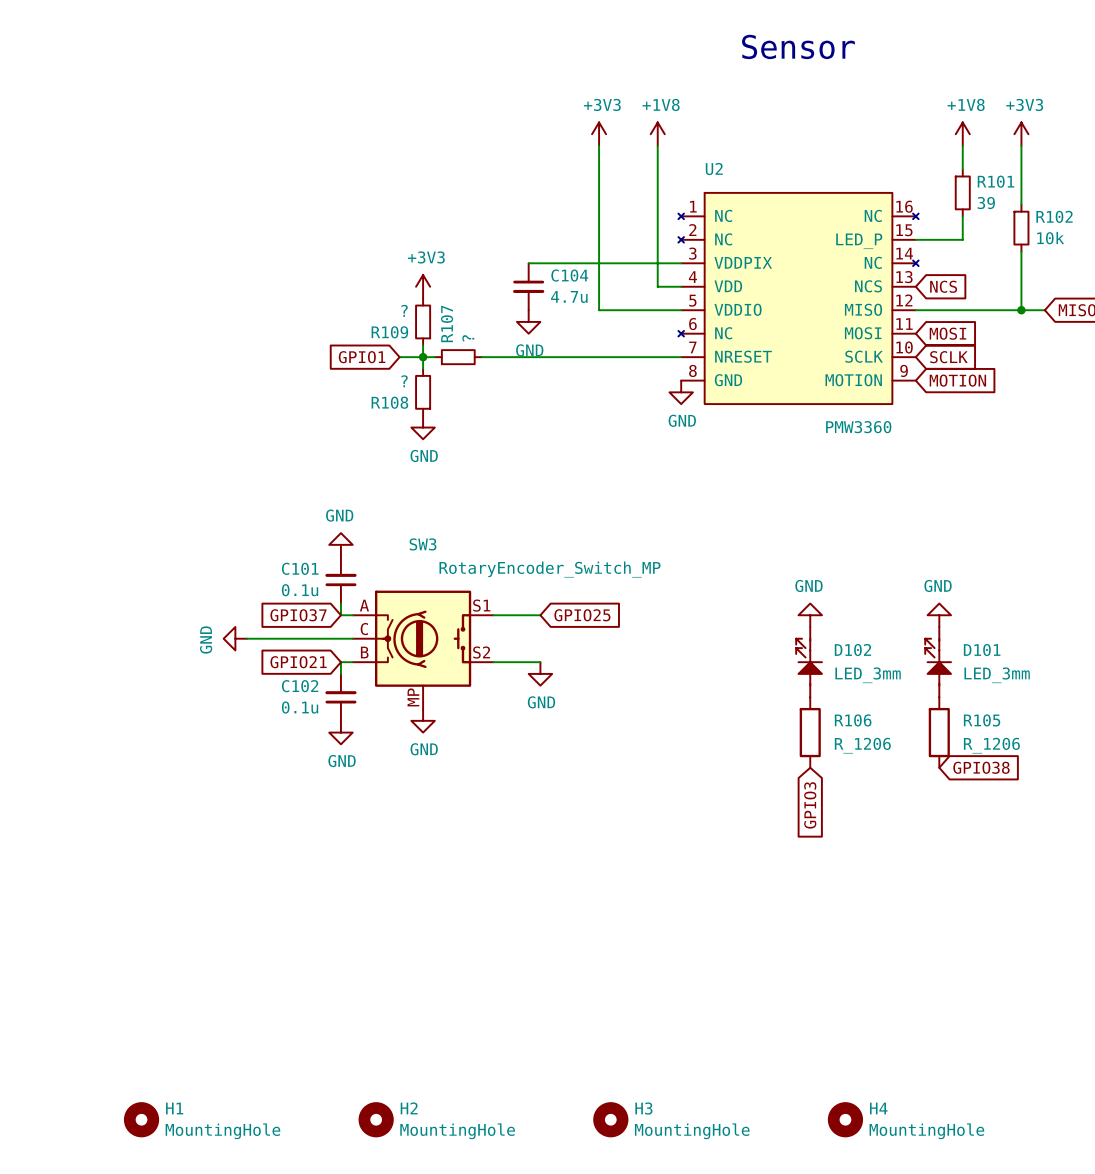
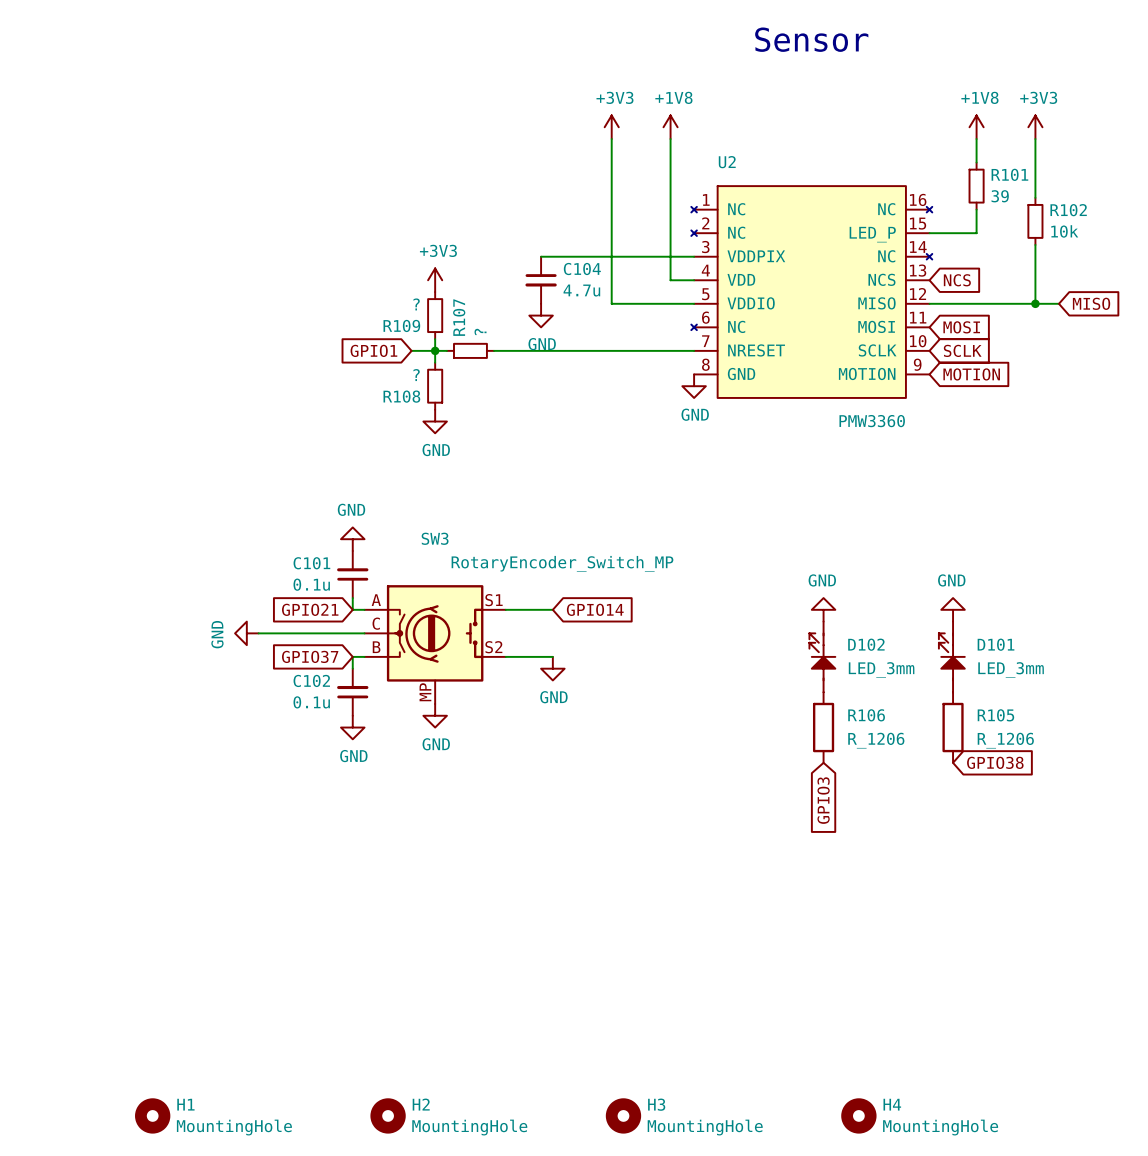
global label: GPIO37 (298, 615) -> GPIO21 (310, 609)
global label: GPIO25 (582, 615) -> GPIO14 (595, 609)
global label: GPIO21 (298, 662) -> GPIO37 (310, 656)

